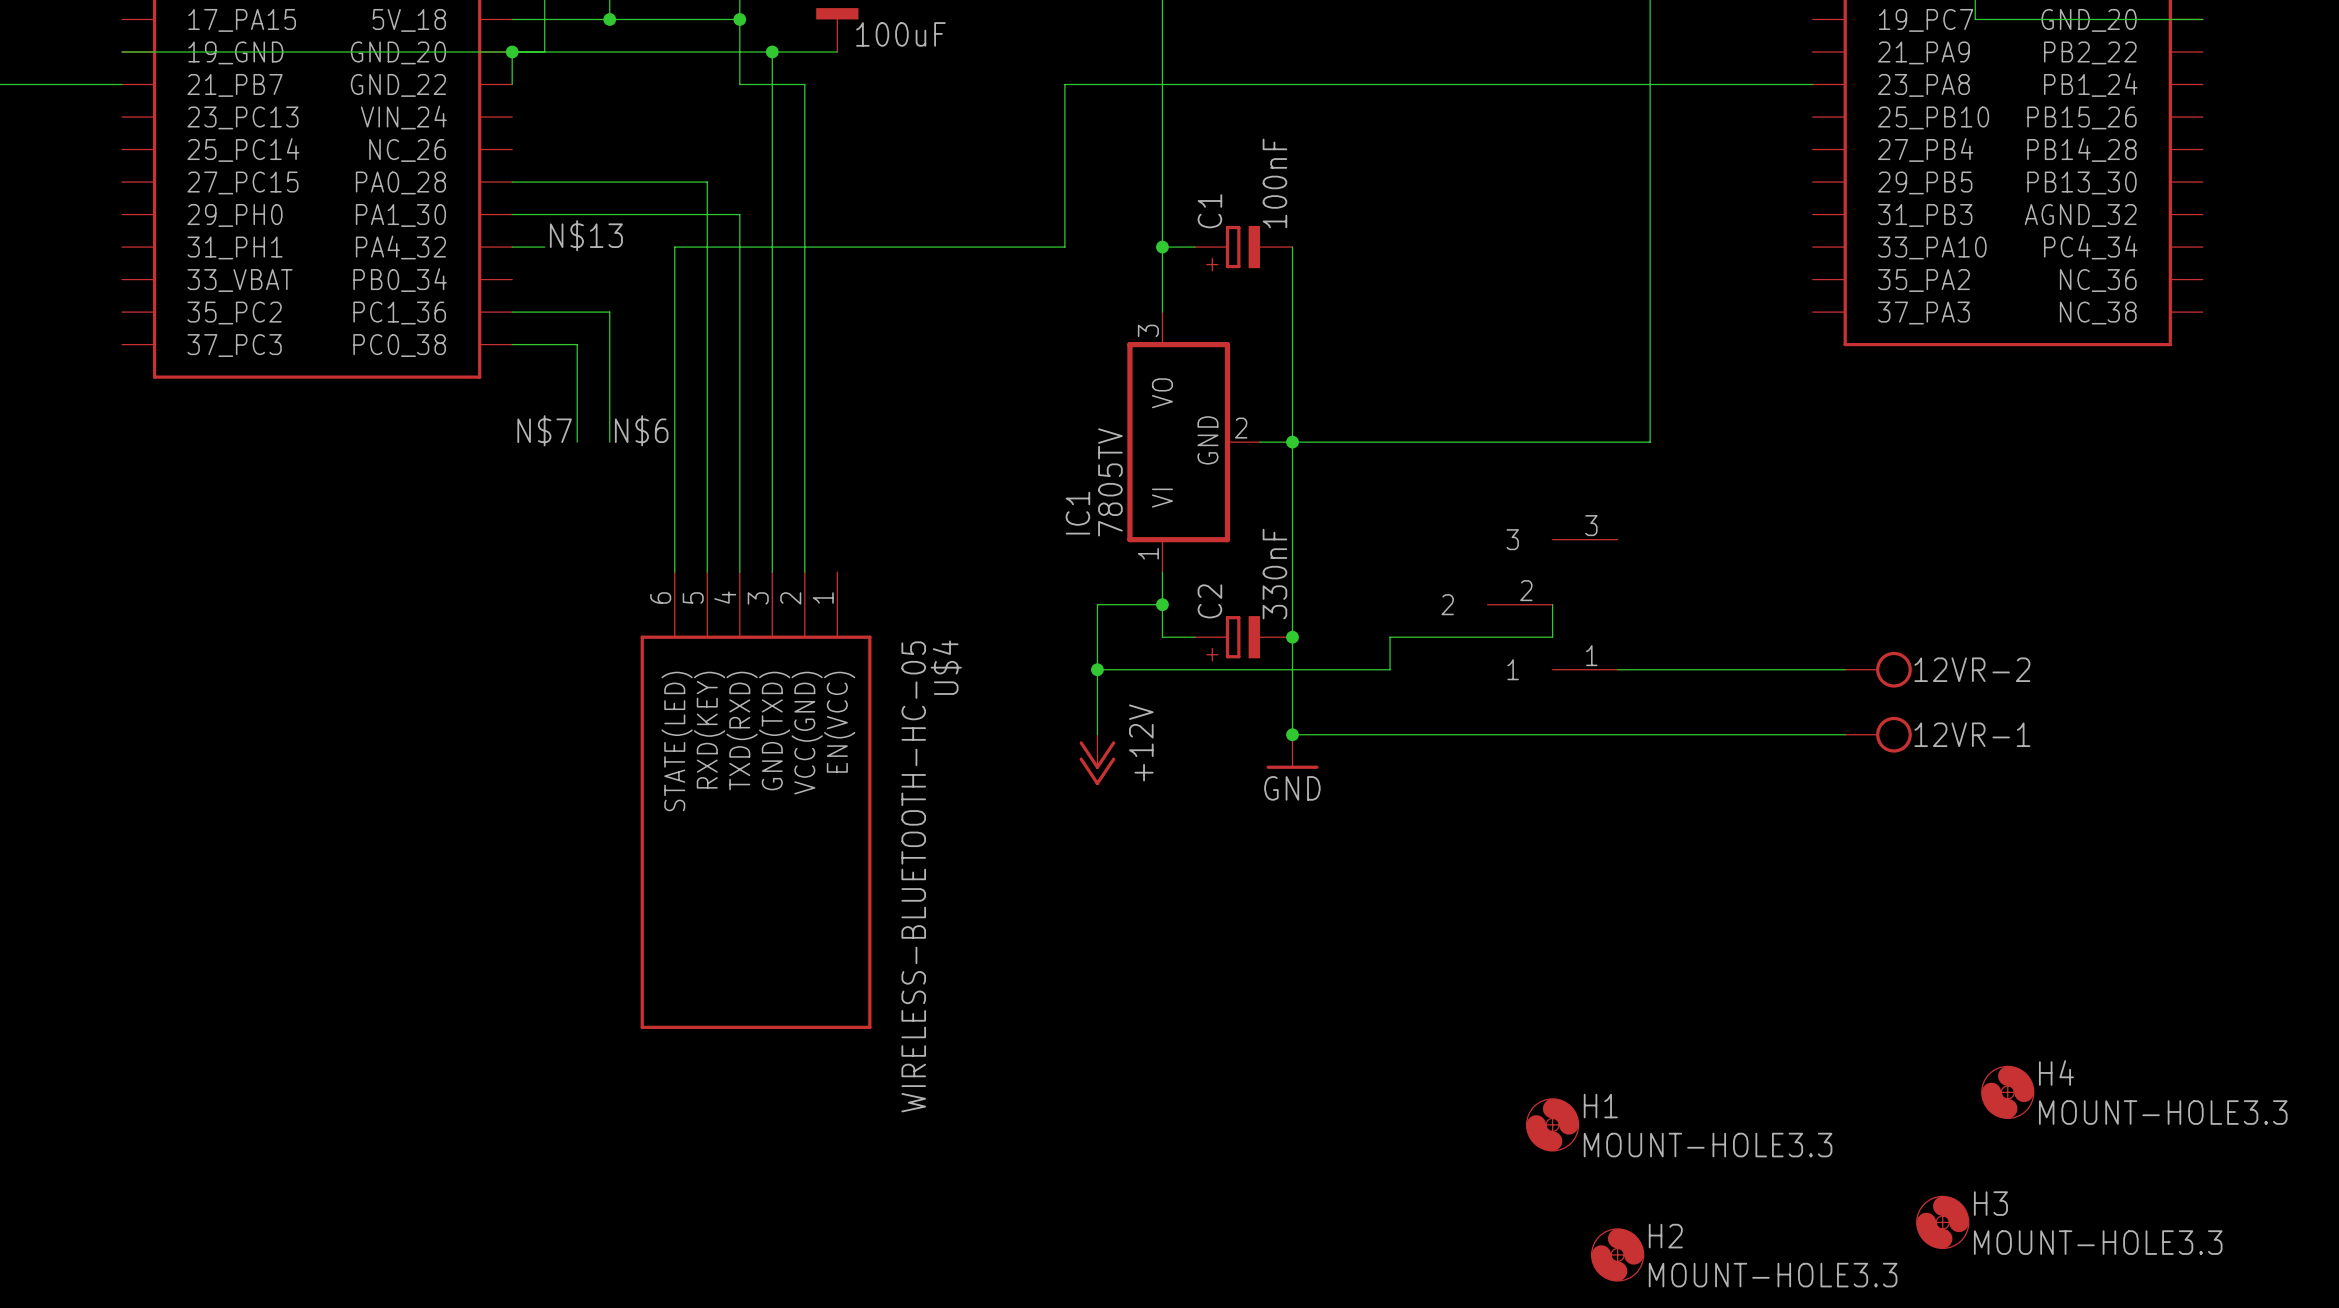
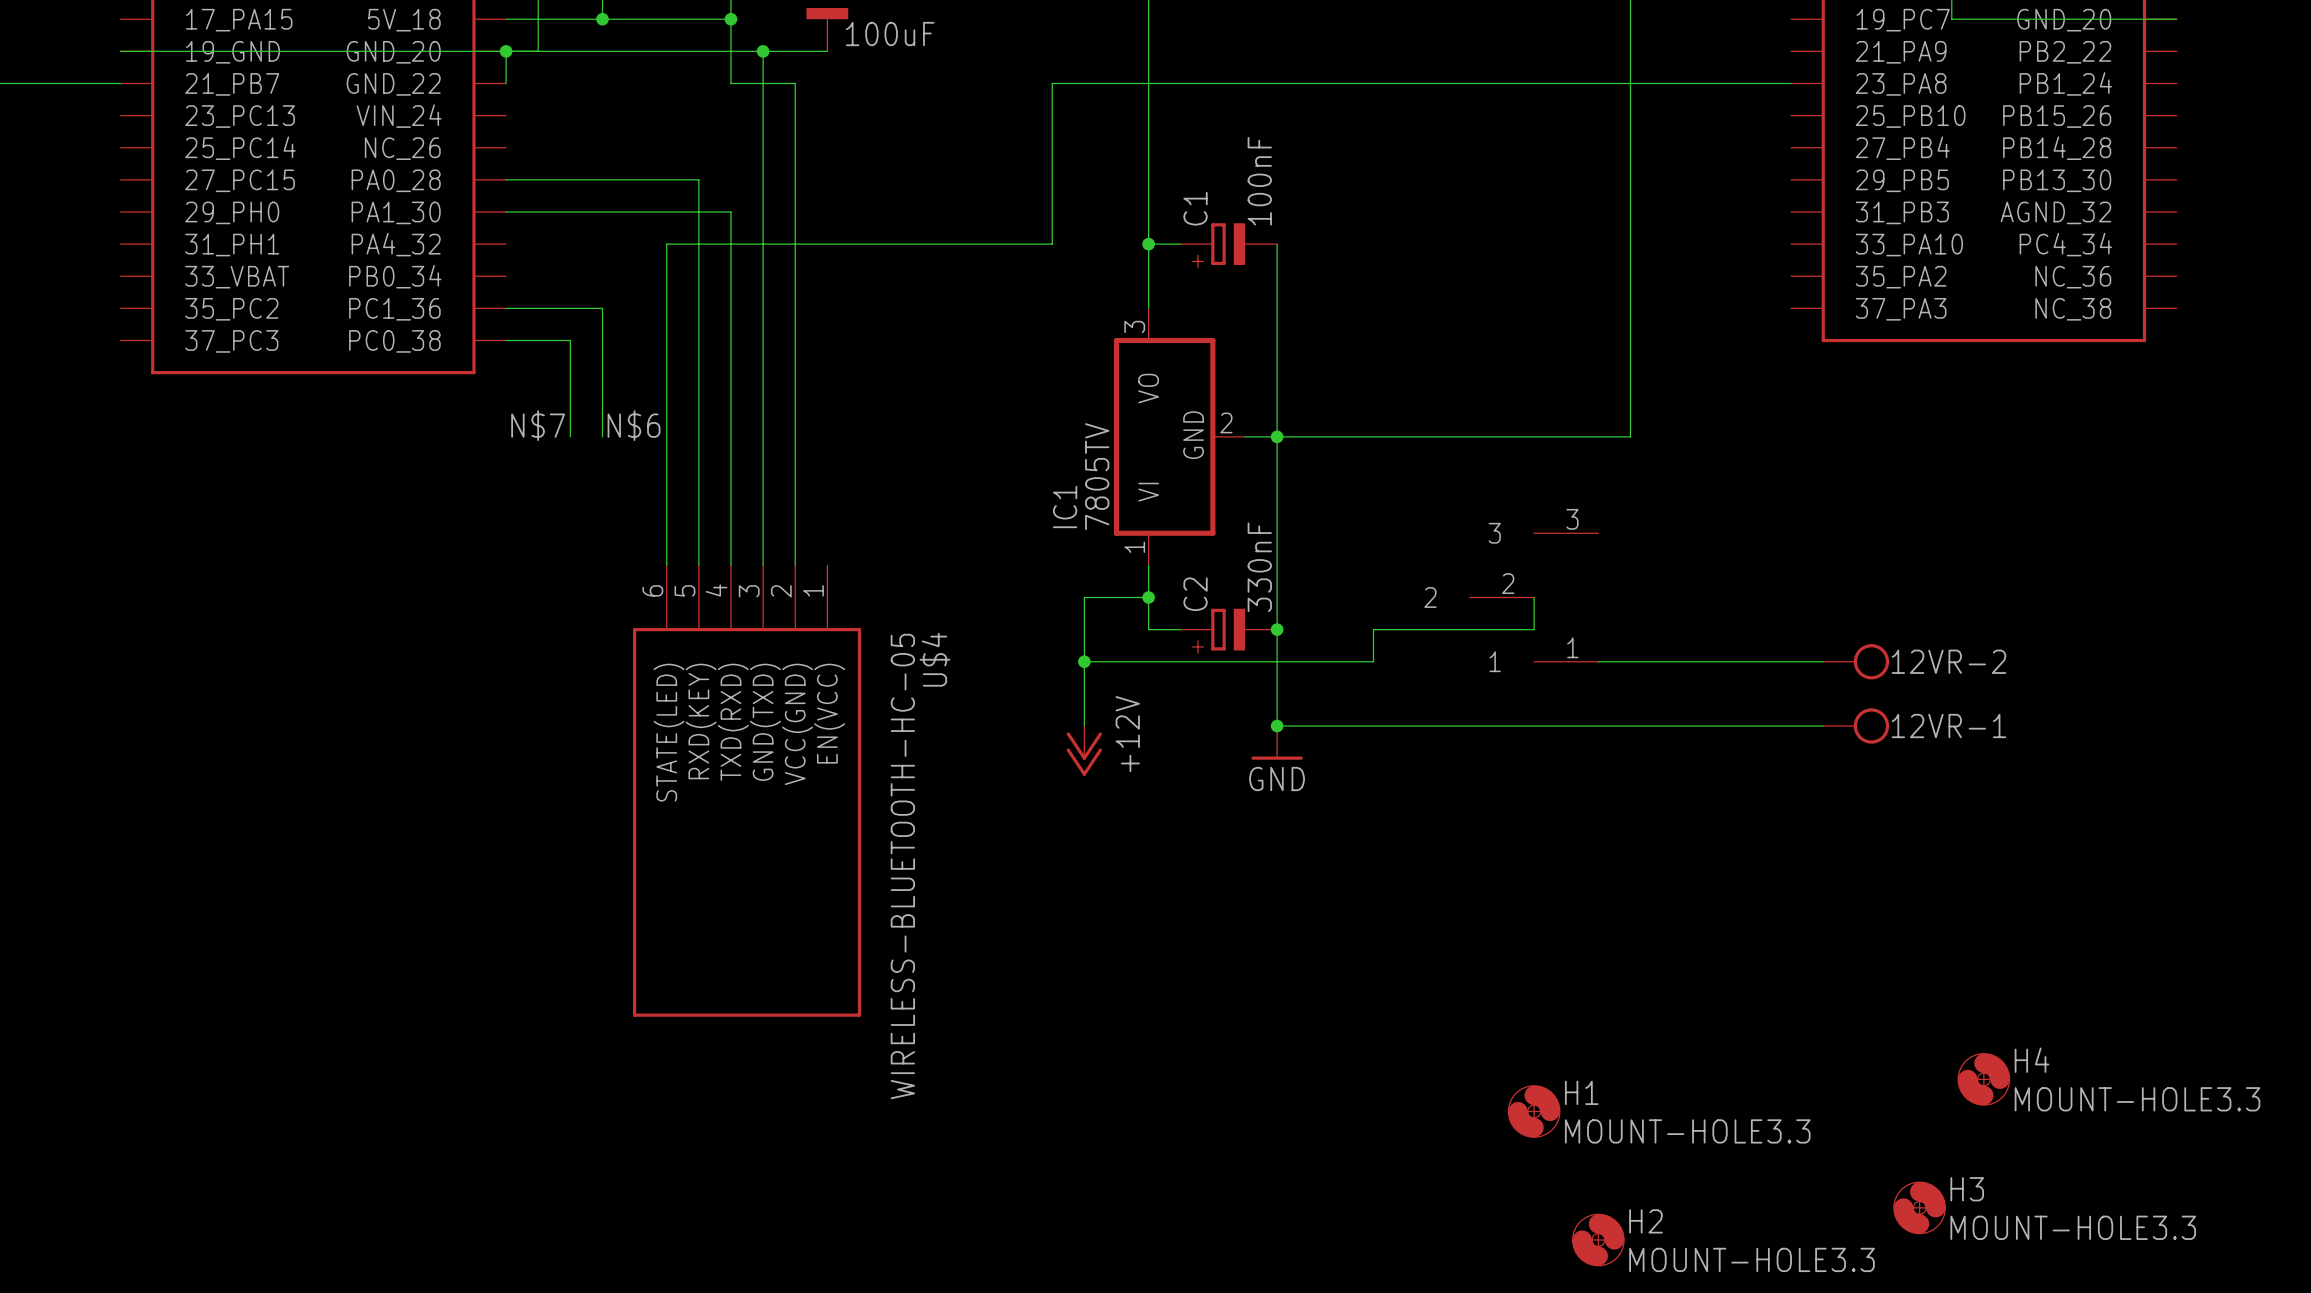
label: N$13 (586, 235) -> none
wire: (512, 247) (544, 247) -> none

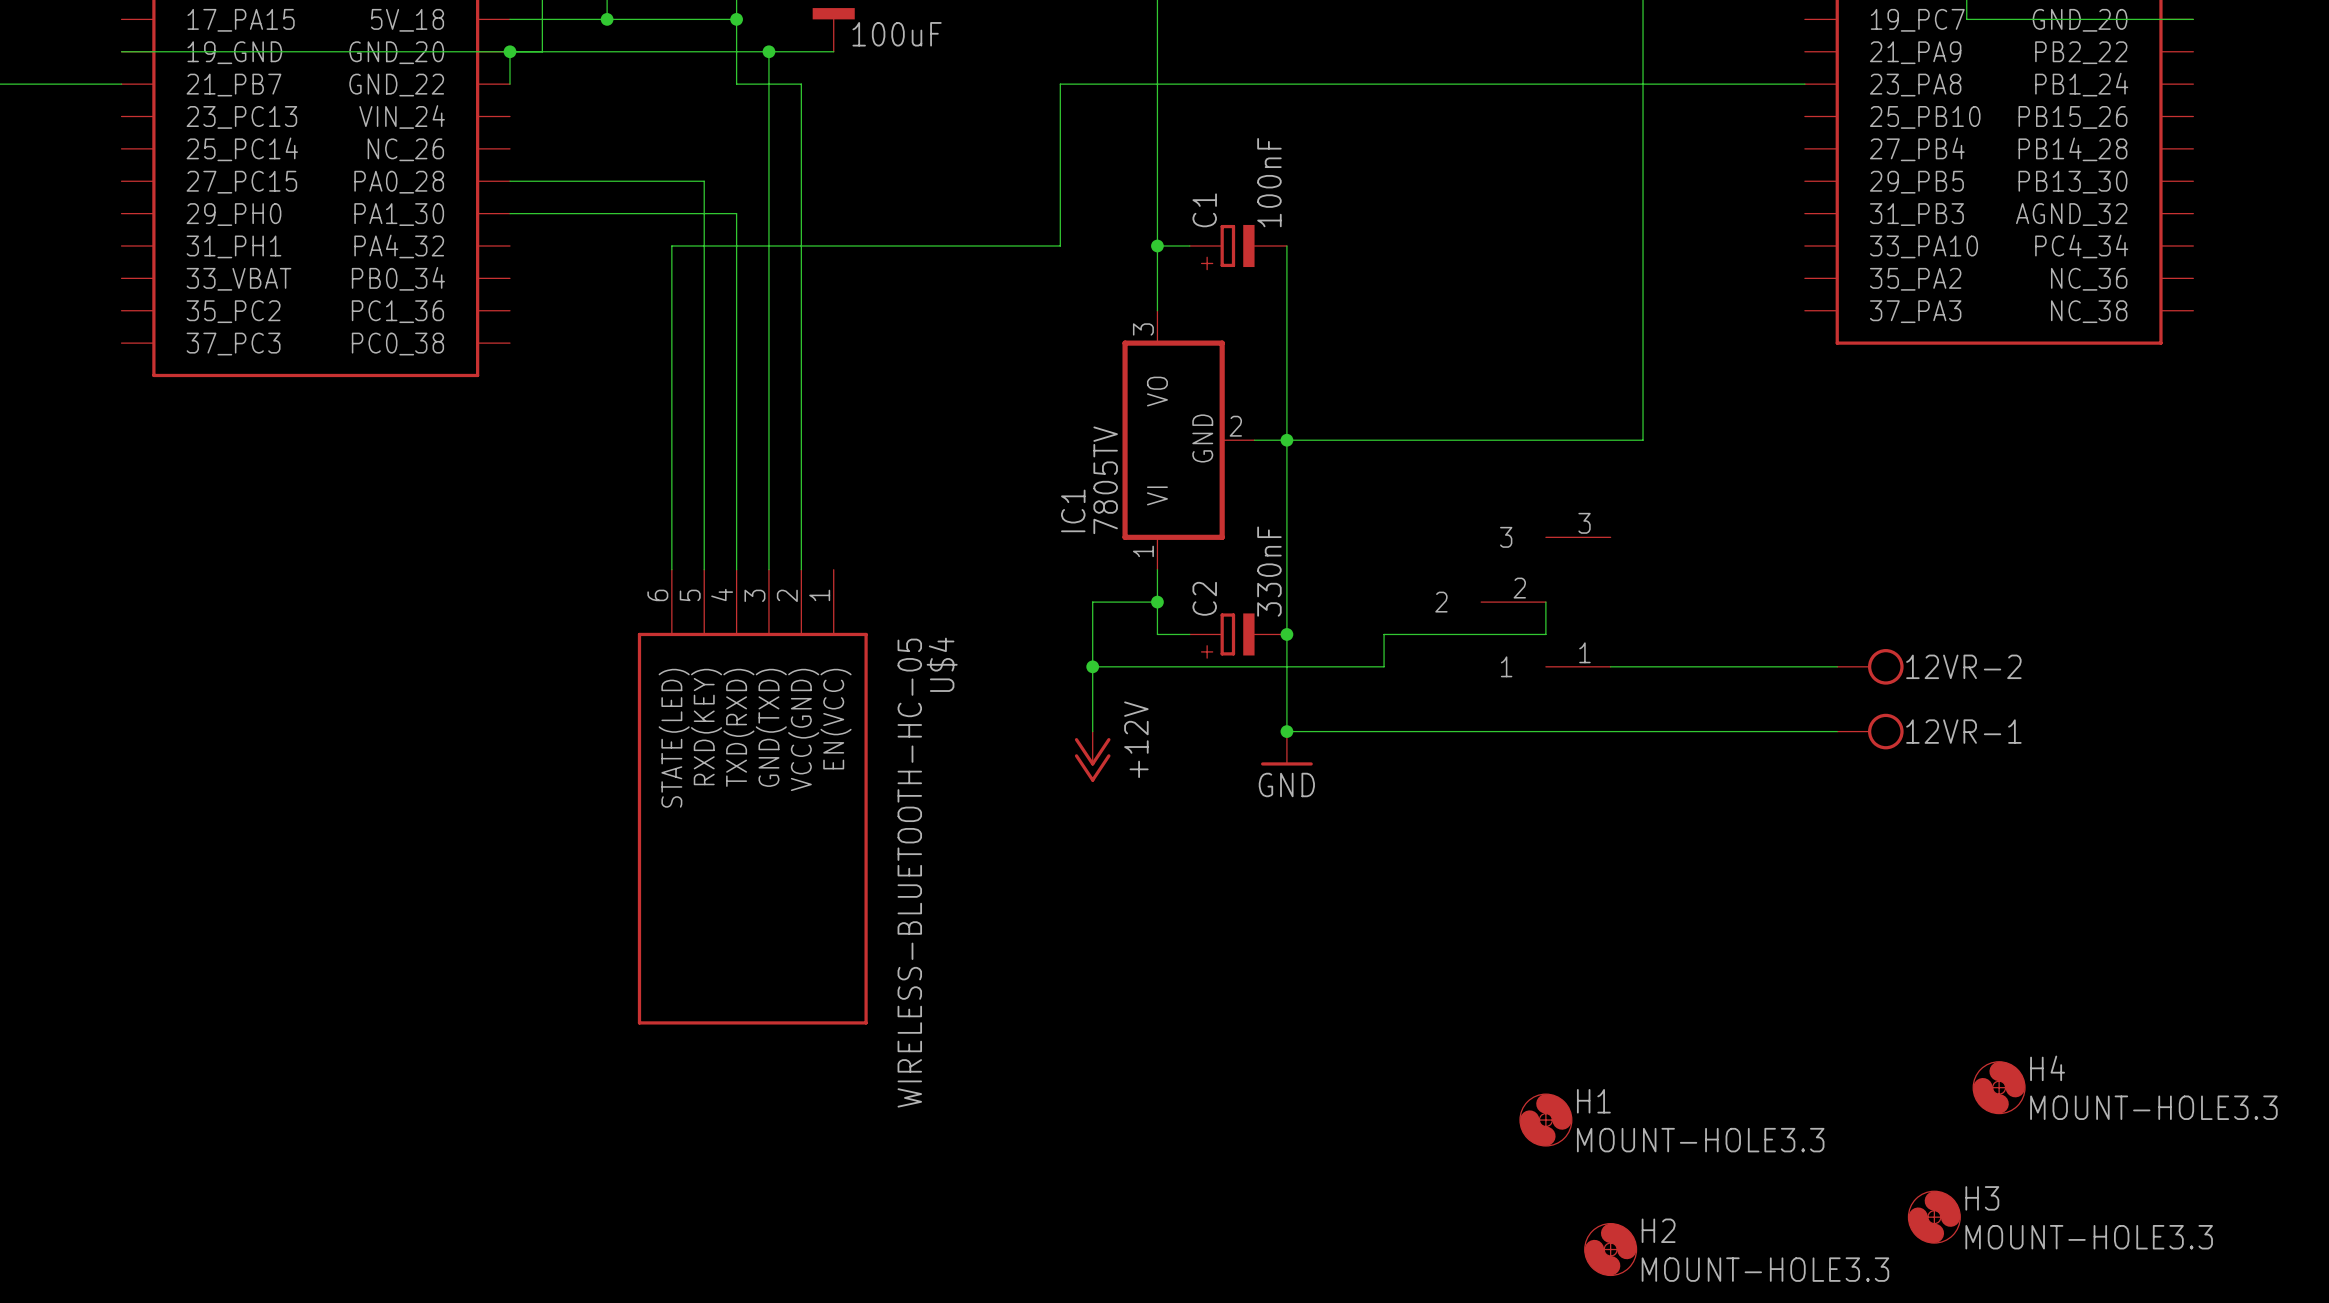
wire: (506, 308) (602, 308) (602, 436) -> none
wire: (506, 340) (570, 340) (570, 436) -> none
label: N$7 (538, 425) -> none
label: N$6 (634, 425) -> none

